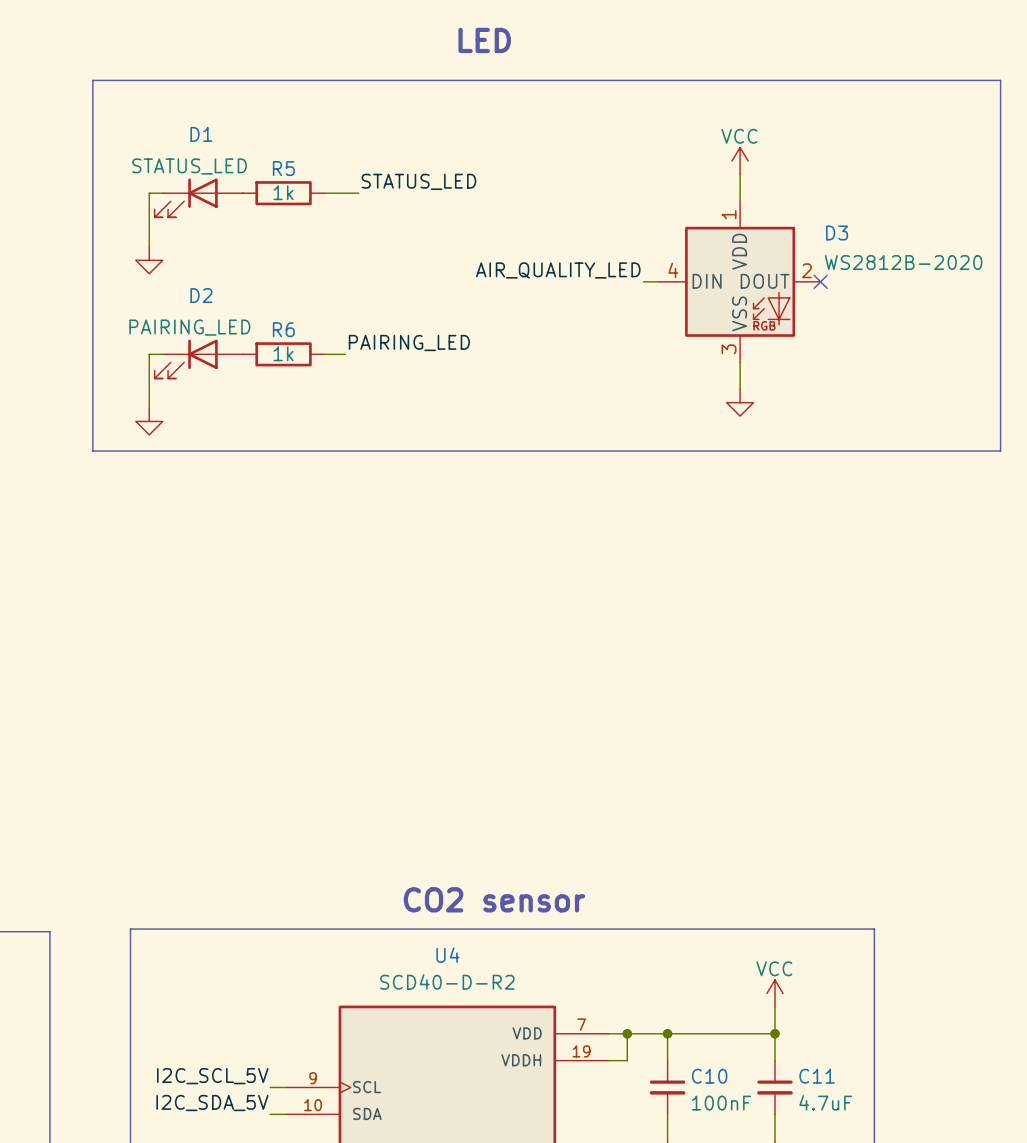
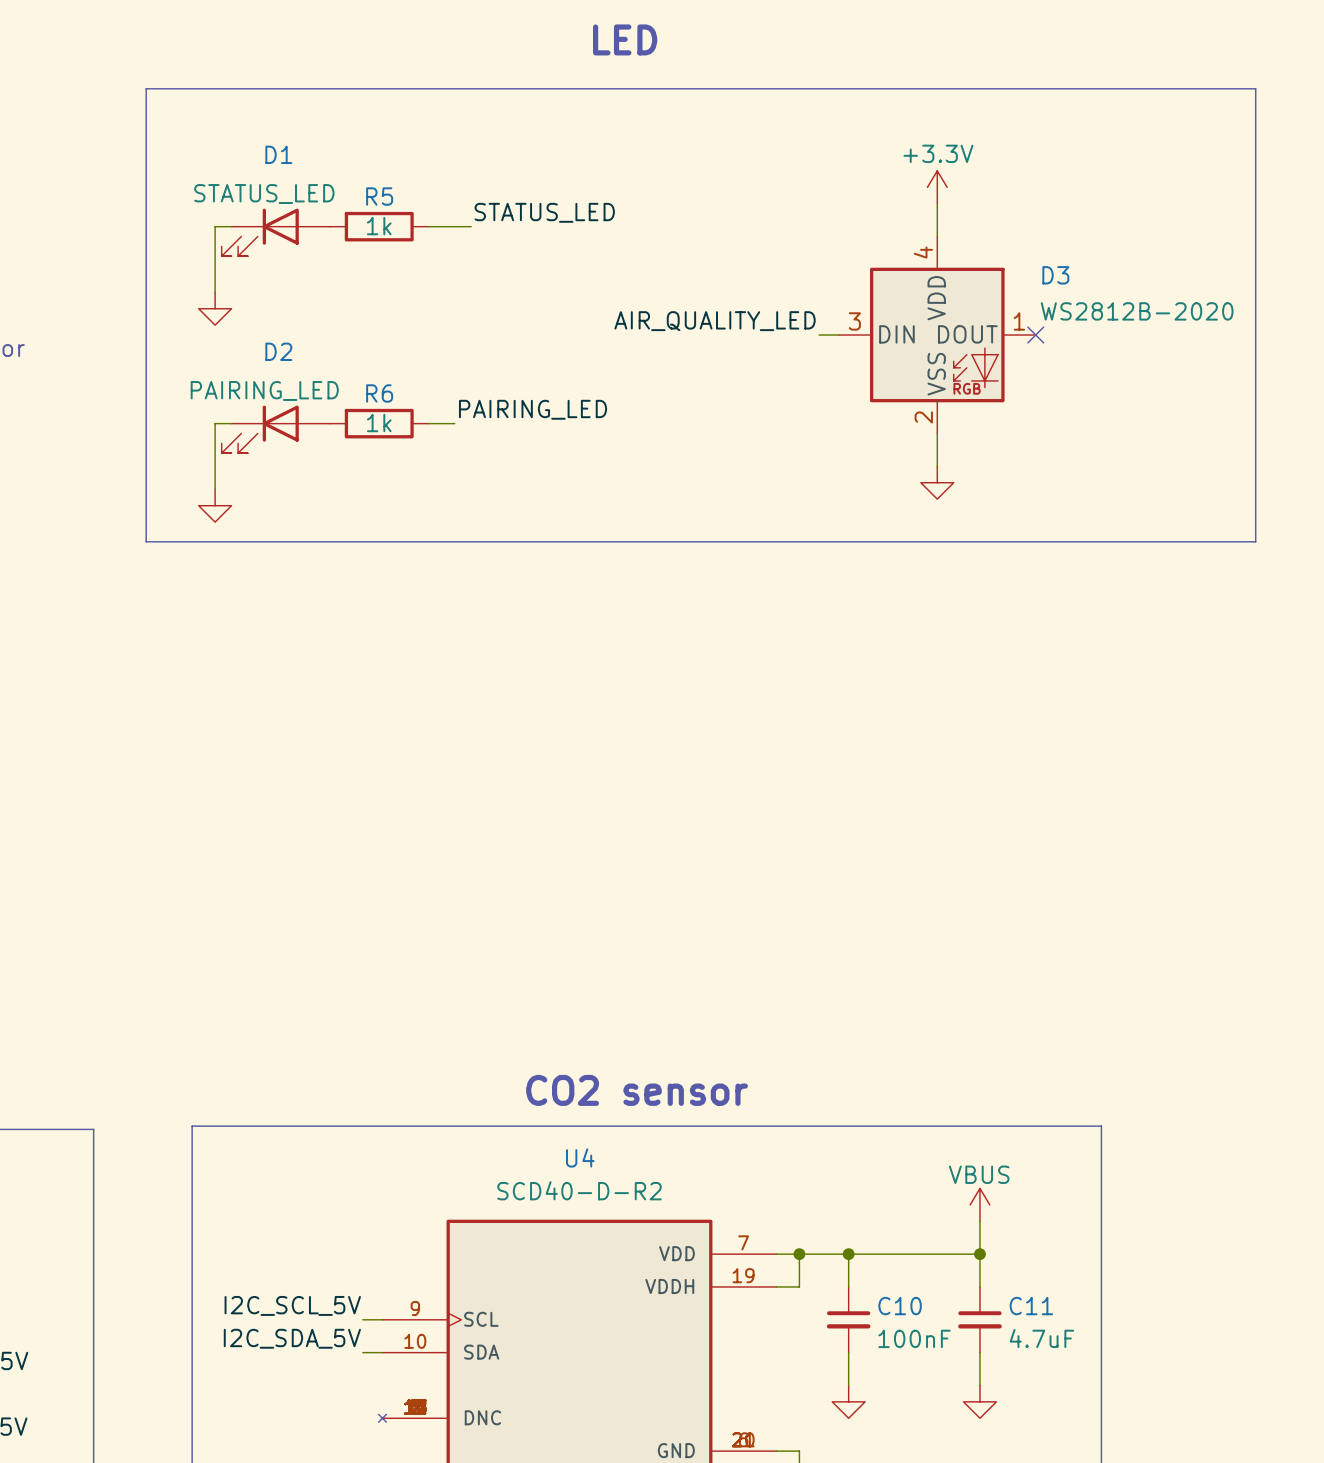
power symbol: VCC (740, 160) -> +3.3V (937, 187)
D3 pin number: 1 (729, 214) -> 4 (923, 252)
D3 pin number: 4 (673, 270) -> 3 (854, 321)
D3 pin number: 2 (806, 270) -> 1 (1019, 321)
D3 pin number: 3 (729, 349) -> 2 (923, 417)
power symbol: VCC (775, 993) -> VBUS (979, 1204)

